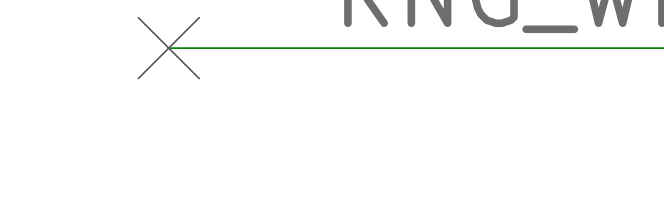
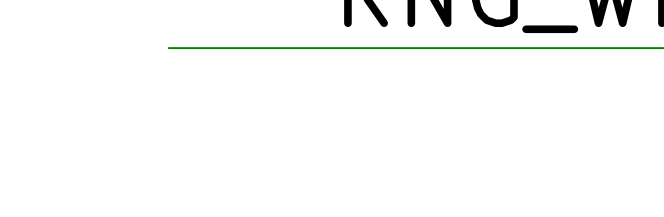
no-connect mark: (168, 48) -> none

